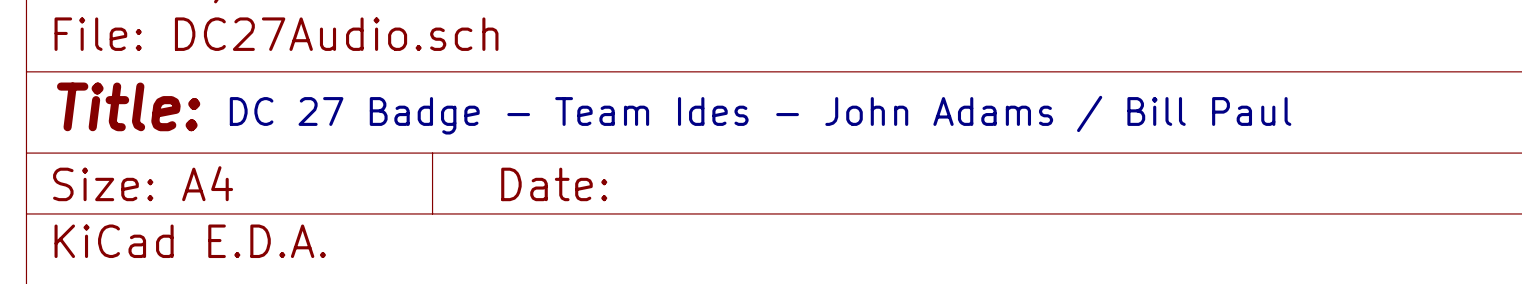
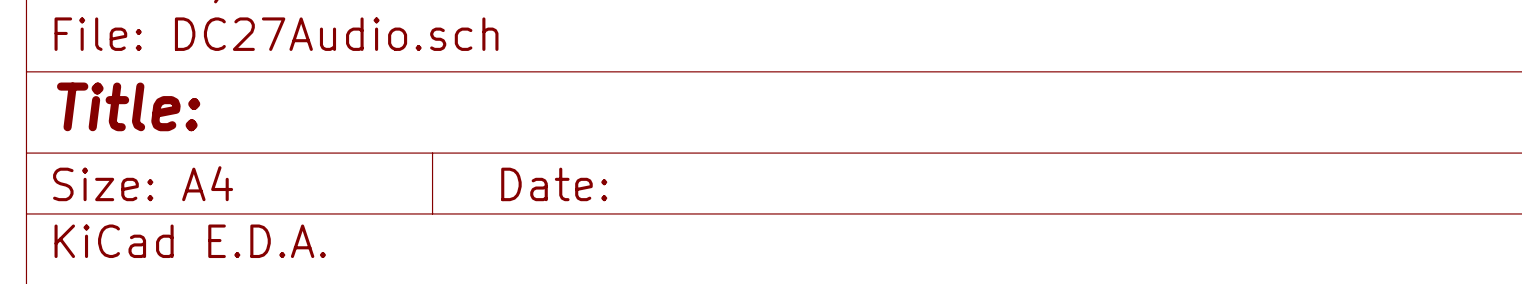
text: DC 27 Badge - Team Ides - John Adams / Bill Paul (760, 115) -> none

